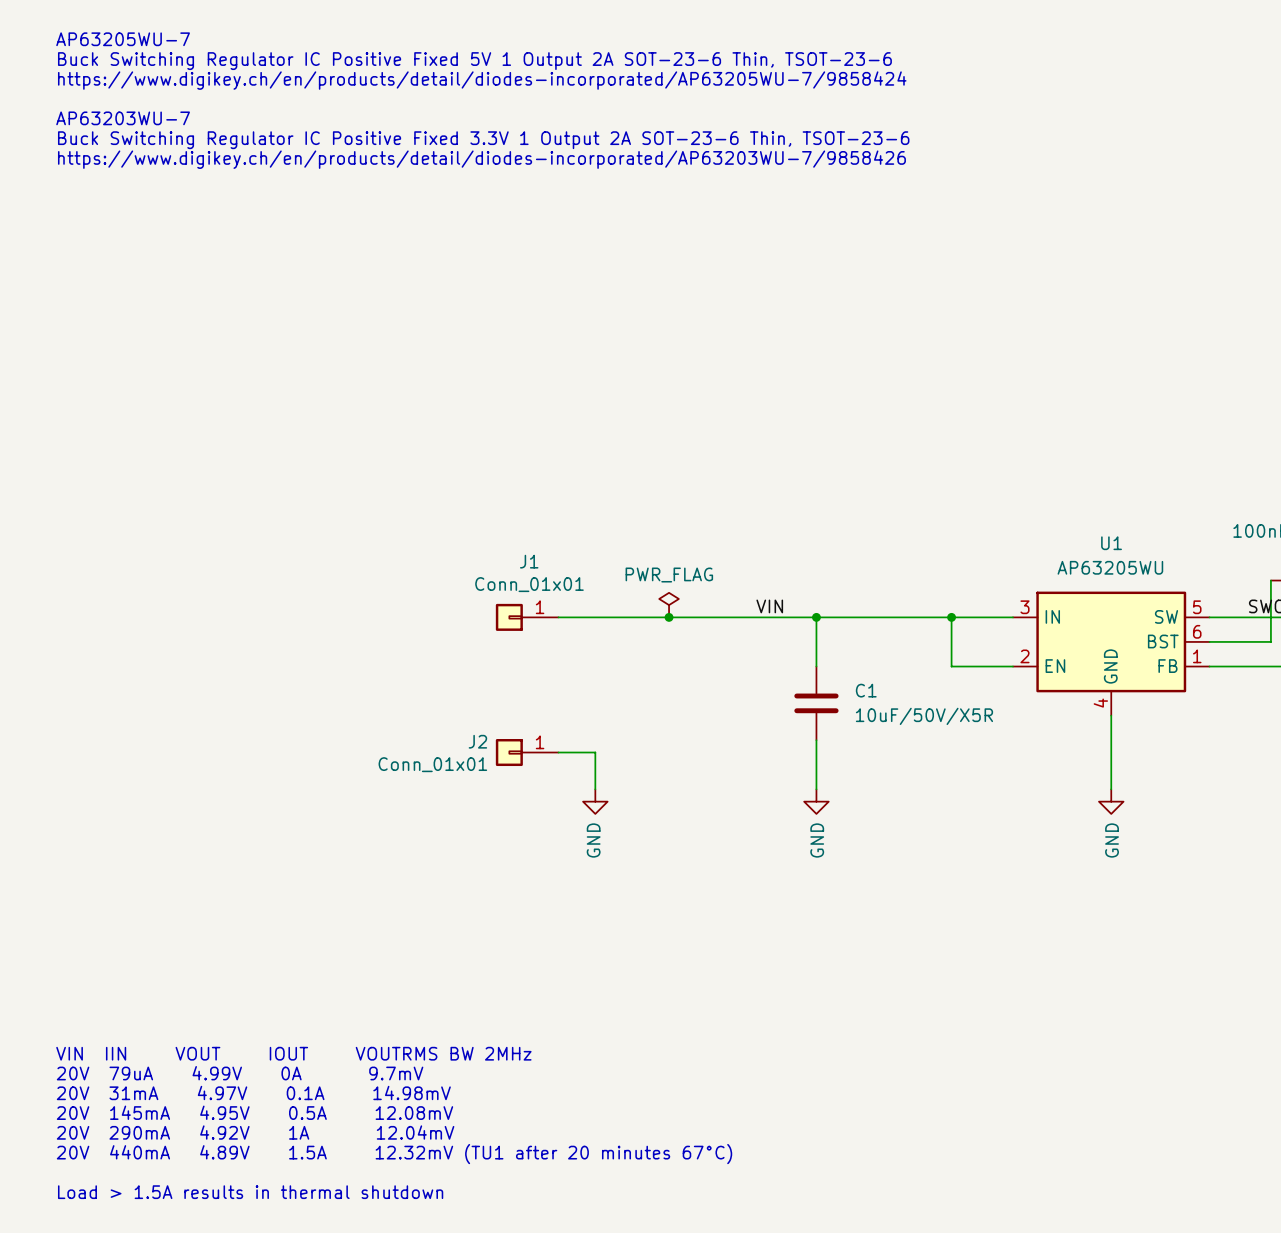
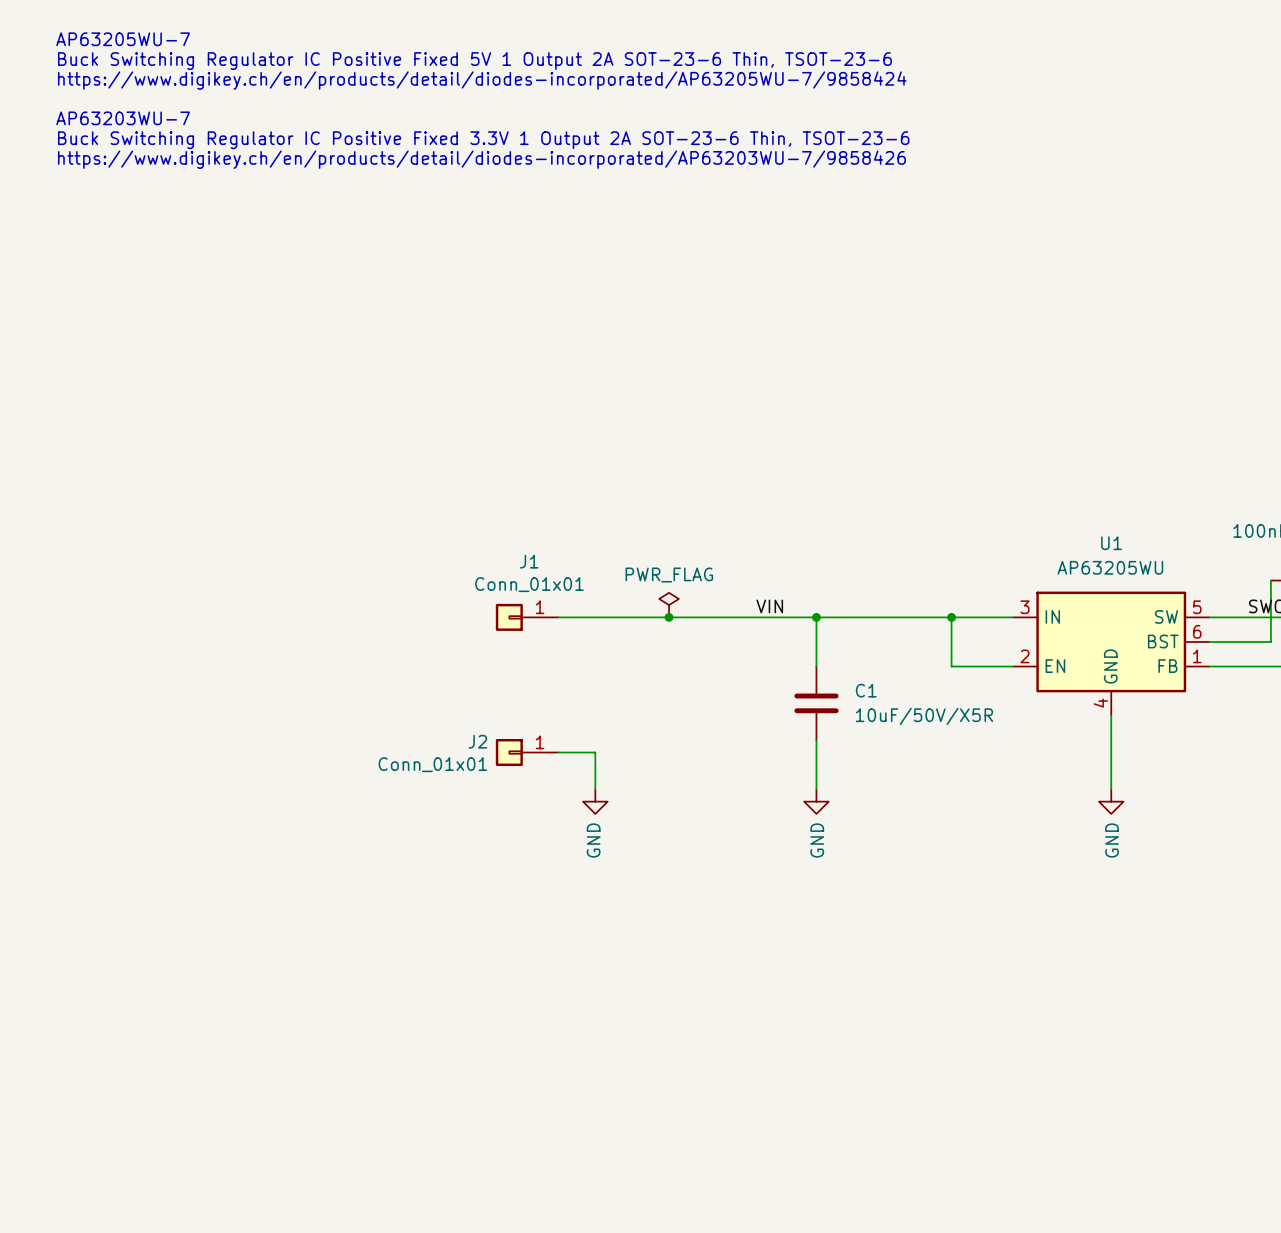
text: VIN IIN VOUT IOUT VOUTRMS BW 2MHz (293, 1053) -> none
text: 20V 79uA 4.99V 0A 9.7mV (240, 1073) -> none
text: 20V 31mA 4.97V 0.1A 14.98mV (253, 1092) -> none
text: 20V 145mA 4.95V 0.5A 12.08mV (255, 1112) -> none
text: 20V 290mA 4.92V 1A 12.04mV (255, 1132) -> none
text: 20V 440mA 4.89V 1.5A 12.32mV (TU1 after 20 minutes 67°C) (394, 1154) -> none
text: Load > 1.5A results in thermal shutdown (250, 1192) -> none

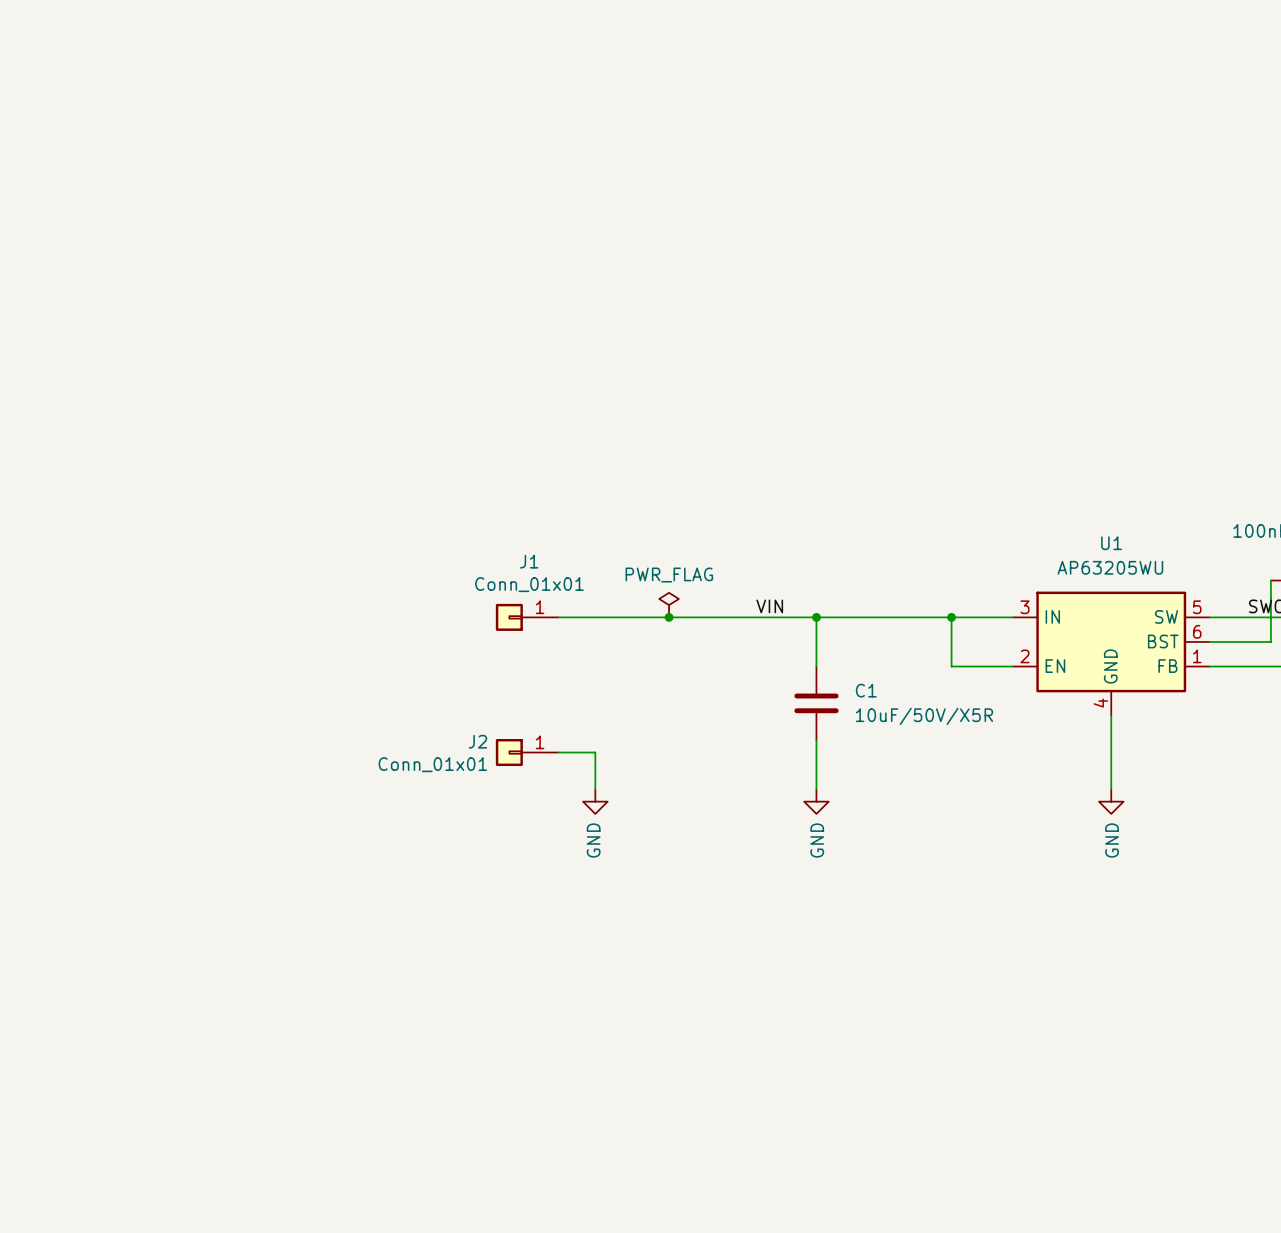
text: AP63205WU-7 (123, 39) -> none
text: Buck Switching Regulator IC Positive Fixed 5V 1 Output 2A SOT-23-6 Thin, TSOT-23-6 (474, 61) -> none
text: https://www.digikey.ch/en/products/detail/diodes-incorporated/AP63205WU-7/9858424 (482, 80) -> none
text: AP63203WU-7 (123, 118) -> none
text: Buck Switching Regulator IC Positive Fixed 3.3V 1 Output 2A SOT-23-6 Thin, TSOT-23-6 (483, 140) -> none
text: https://www.digikey.ch/en/products/detail/diodes-incorporated/AP63203WU-7/9858426 (481, 159) -> none

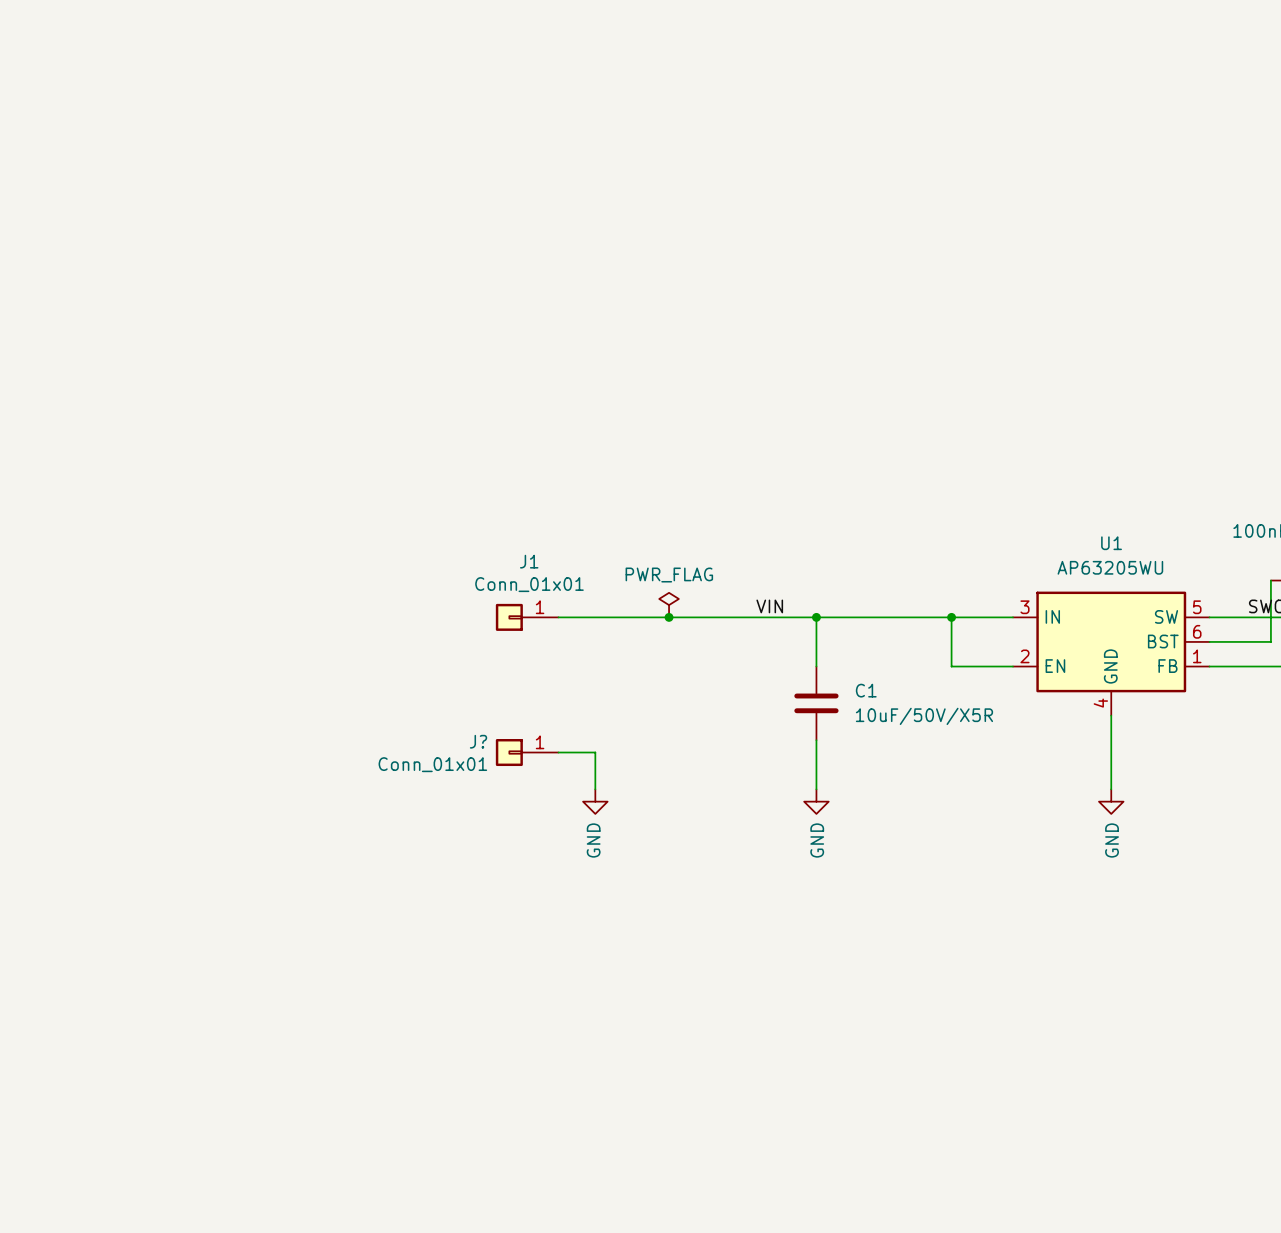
J2 name: J2 (477, 741) -> J? (478, 741)

